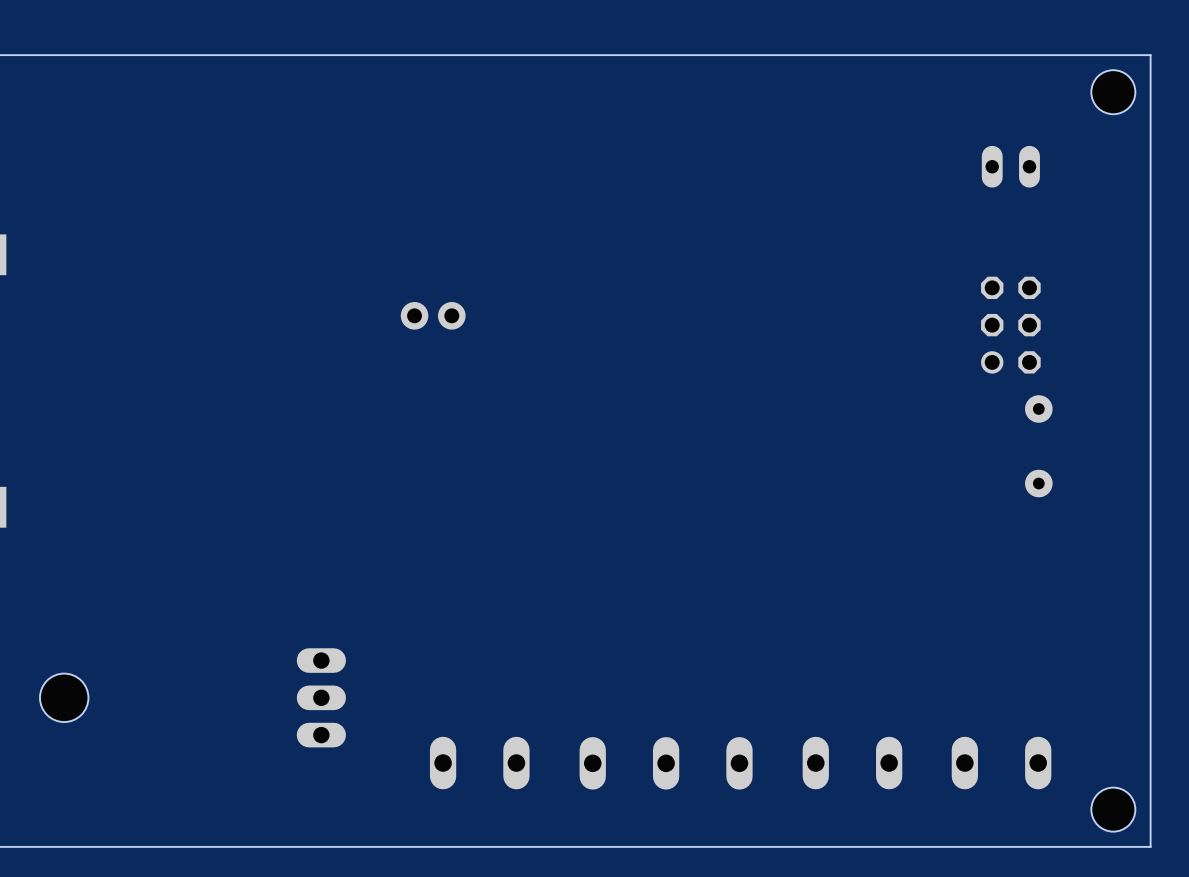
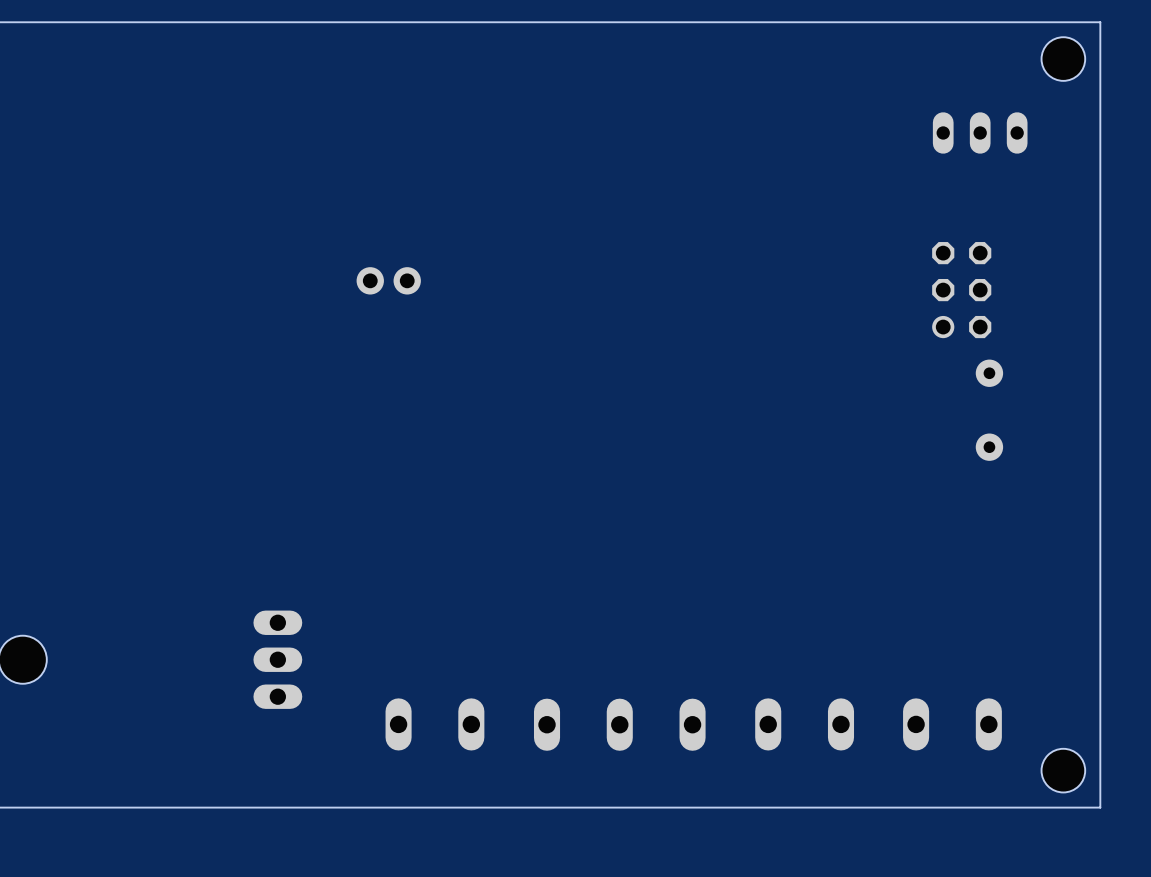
part: none -> (980, 132)

